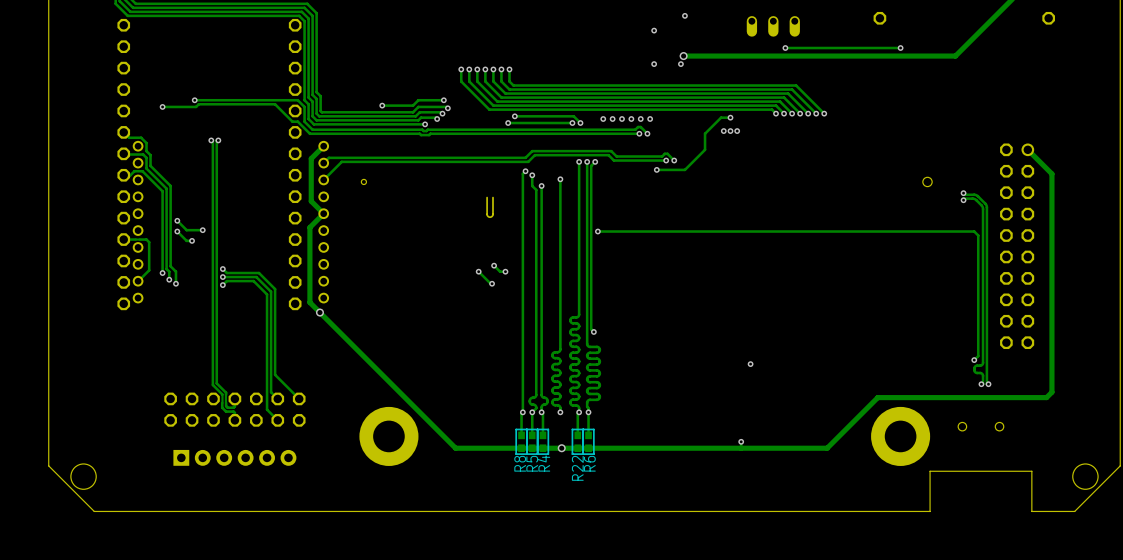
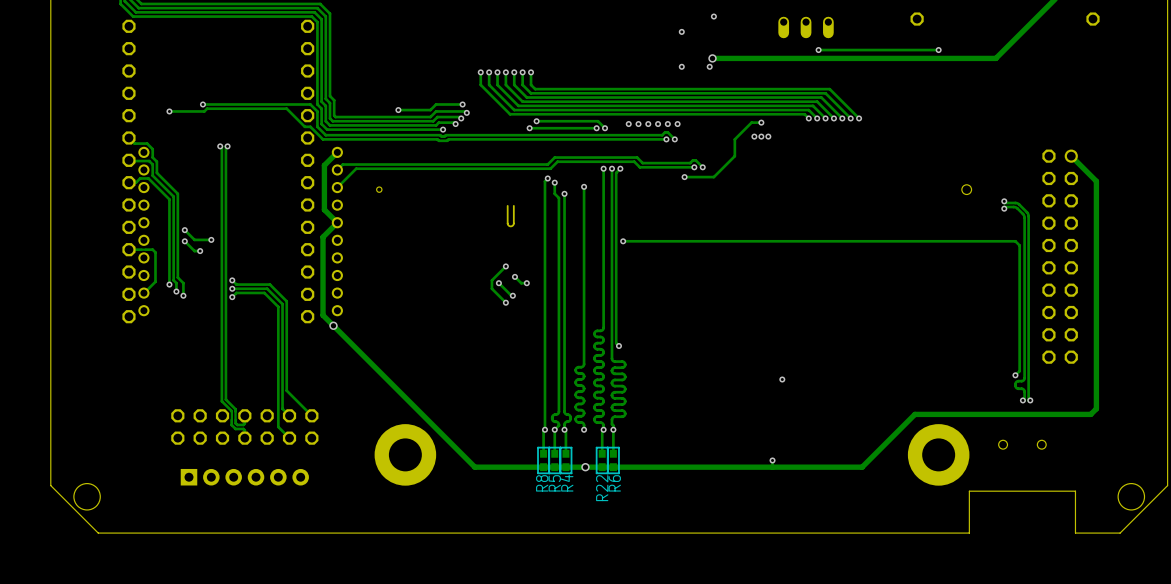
track: none -> (505, 266) (491, 280) (491, 288) (505, 302)
via: none -> (505, 266)
via: none -> (505, 302)

